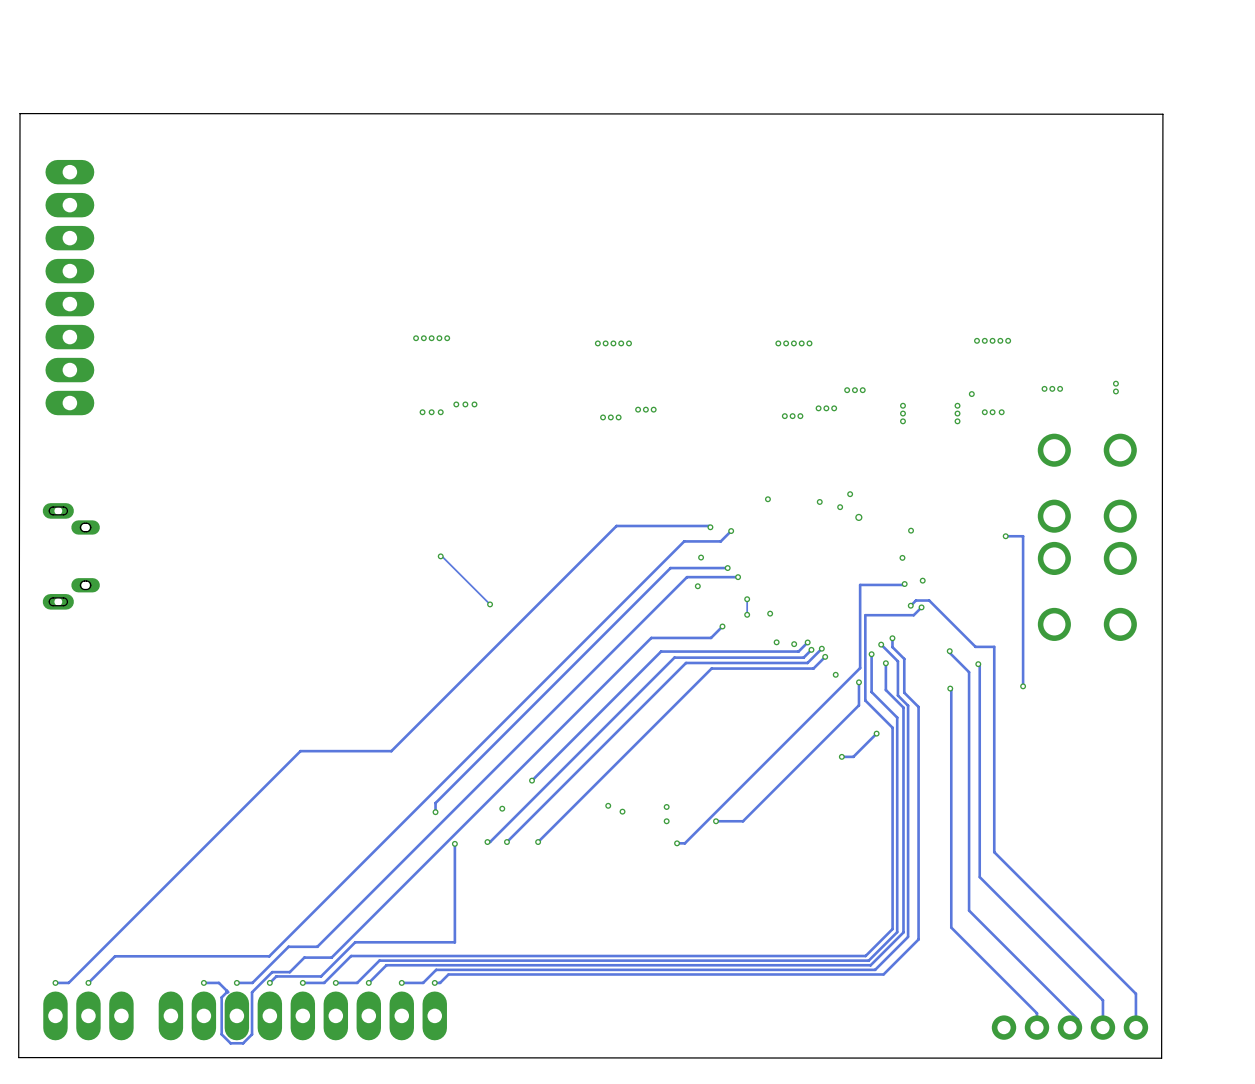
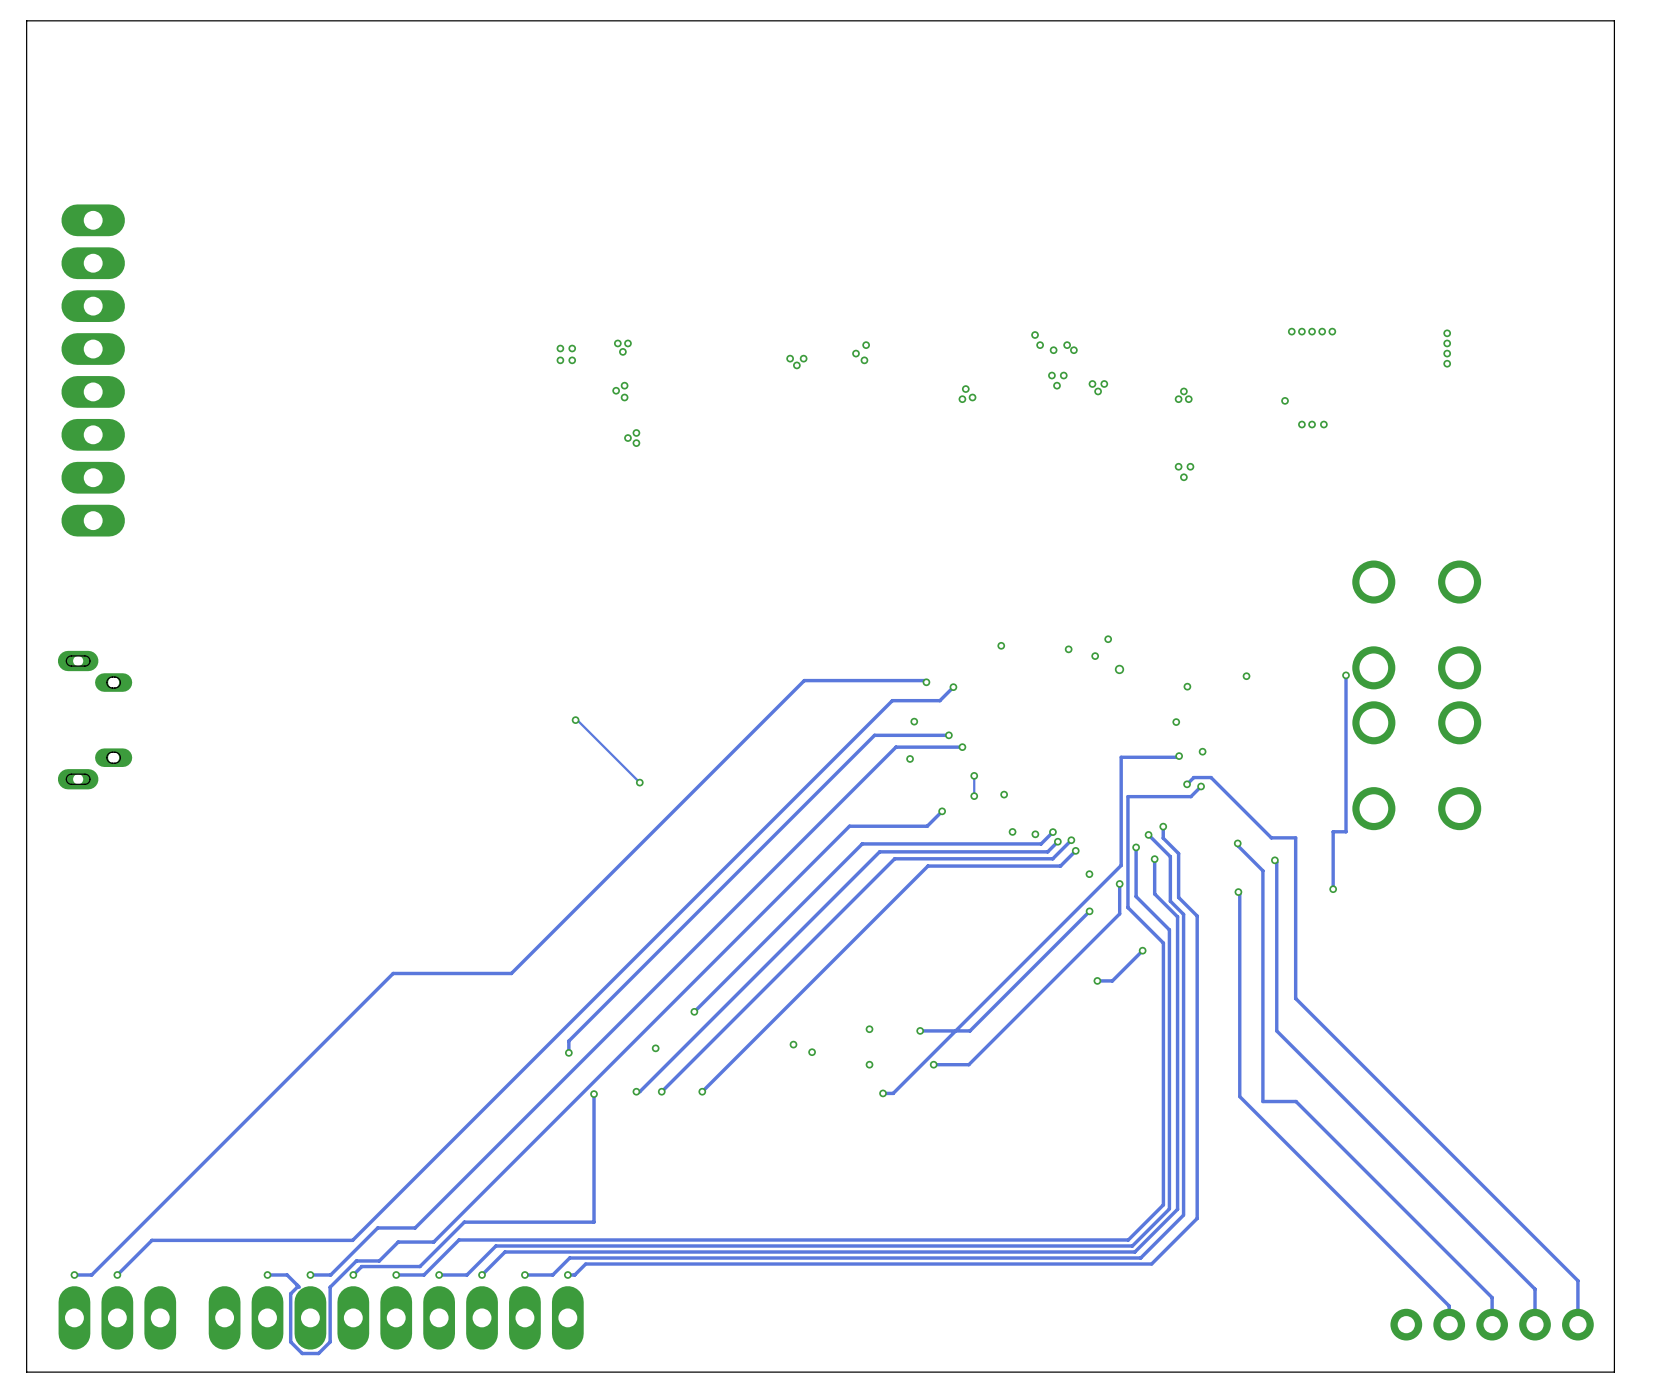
board edge: (20, 113) (18, 1057) (1161, 1058) (1162, 114) (20, 113) -> (1614, 20) (1614, 1372) (26, 1372) (26, 20) (1614, 20)
via: none -> (1291, 331)
via: none -> (1301, 331)
via: none -> (1312, 331)
via: none -> (1322, 331)
via: none -> (1332, 331)
via: none -> (1447, 333)
via: none -> (1035, 335)
via: none -> (617, 343)
via: none -> (627, 343)
via: none -> (1447, 343)
via: none -> (866, 345)
via: none -> (1040, 345)
via: none -> (1067, 345)
via: none -> (560, 348)
via: none -> (572, 348)
via: none -> (1053, 350)
via: none -> (1073, 350)
via: none -> (622, 351)
via: none -> (855, 353)
via: none -> (1447, 353)
via: none -> (790, 358)
via: none -> (803, 358)
via: none -> (560, 360)
via: none -> (572, 360)
via: none -> (864, 360)
via: none -> (1447, 363)
via: none -> (796, 365)
via: none -> (1051, 375)
via: none -> (1063, 375)
via: none -> (1092, 383)
via: none -> (1104, 383)
via: none -> (624, 385)
via: none -> (1057, 385)
via: none -> (965, 389)
via: none -> (616, 390)
via: none -> (1098, 391)
via: none -> (1183, 391)
via: none -> (624, 397)
via: none -> (972, 397)
via: none -> (962, 399)
via: none -> (1178, 399)
via: none -> (1188, 399)
via: none -> (1285, 400)
via: none -> (1301, 424)
via: none -> (1312, 424)
via: none -> (1323, 424)
via: none -> (636, 432)
via: (416, 338) -> none
via: (423, 338) -> none
via: (431, 338) -> none
via: (439, 338) -> none
via: (447, 338) -> none
via: none -> (627, 438)
via: (977, 340) -> none
via: (984, 340) -> none
via: (992, 340) -> none
via: (1000, 340) -> none
via: (1008, 340) -> none
via: none -> (636, 443)
via: (597, 343) -> none
via: (605, 343) -> none
via: (613, 343) -> none
via: (621, 343) -> none
via: (629, 343) -> none
via: (778, 343) -> none
via: (786, 343) -> none
via: (793, 343) -> none
via: (801, 343) -> none
via: (809, 343) -> none
via: none -> (1178, 466)
via: none -> (1190, 466)
via: none -> (1183, 477)
via: (1115, 383) -> none
via: (1044, 388) -> none
via: (1052, 388) -> none
via: (1060, 388) -> none
via: (847, 390) -> none
via: (854, 390) -> none
via: (862, 390) -> none
via: (1115, 391) -> none
via: (971, 394) -> none
via: (456, 404) -> none
via: (465, 404) -> none
via: (474, 404) -> none
via: (902, 405) -> none
via: (957, 405) -> none
via: (818, 408) -> none
via: (826, 408) -> none
via: (834, 408) -> none
via: (638, 409) -> none
via: (645, 409) -> none
via: (653, 409) -> none
via: (422, 412) -> none
via: (431, 412) -> none
via: (440, 412) -> none
via: (984, 412) -> none
via: (992, 412) -> none
via: (1001, 412) -> none
via: (902, 413) -> none
via: (957, 413) -> none
via: (784, 416) -> none
via: (792, 416) -> none
via: (800, 416) -> none
via: (603, 417) -> none
via: (610, 417) -> none
via: (618, 417) -> none
via: (902, 421) -> none
via: (957, 421) -> none
via: none -> (1346, 675)
via: none -> (1246, 676)
track: (1005, 536) (1023, 536) (1023, 642) -> (1346, 675) (1346, 831) (1333, 831)
via: (1005, 536) -> none
track: none -> (1089, 911) (970, 1030) (920, 1030)
via: none -> (1089, 911)
track: (994, 770) (994, 852) (1135, 993) (1135, 1027) -> (1295, 998) (1577, 1280) (1577, 1324)
via: none -> (920, 1030)
track: (979, 795) (979, 877) (1102, 1000) (1102, 1027) -> (1276, 1030) (1535, 1289) (1535, 1324)
via position: (666, 806) -> (869, 1029)
track: (951, 845) (951, 927) (1036, 1013) (1036, 1027) -> (1239, 1096) (1449, 1306) (1449, 1324)
track: (969, 849) (969, 910) (1078, 1019) (1069, 1027) -> (1262, 1101) (1296, 1101) (1492, 1297) (1492, 1324)
part position: (1069, 1027) -> (1492, 1324)

